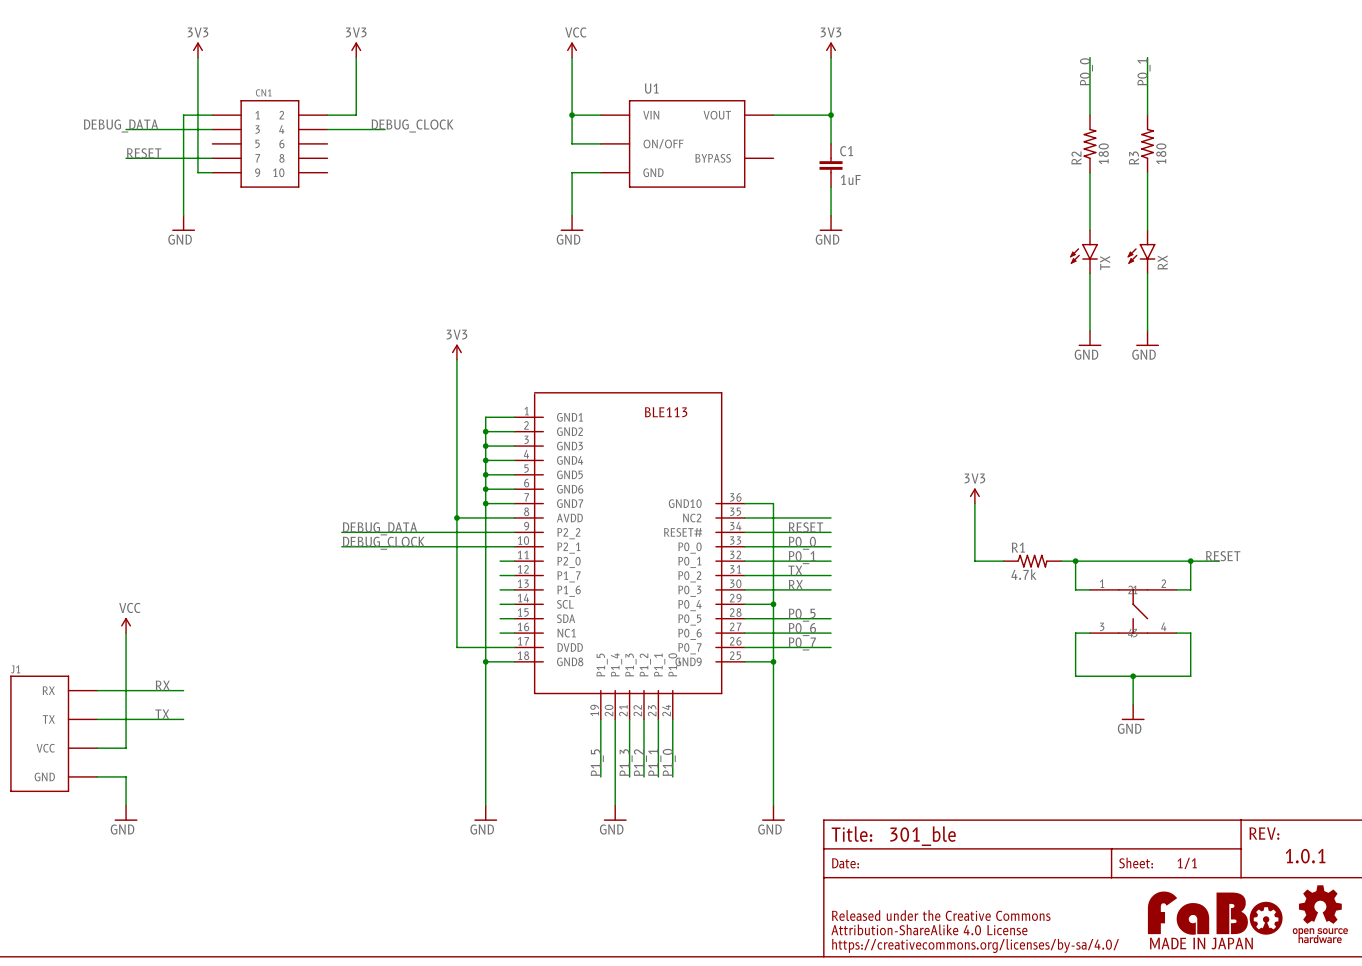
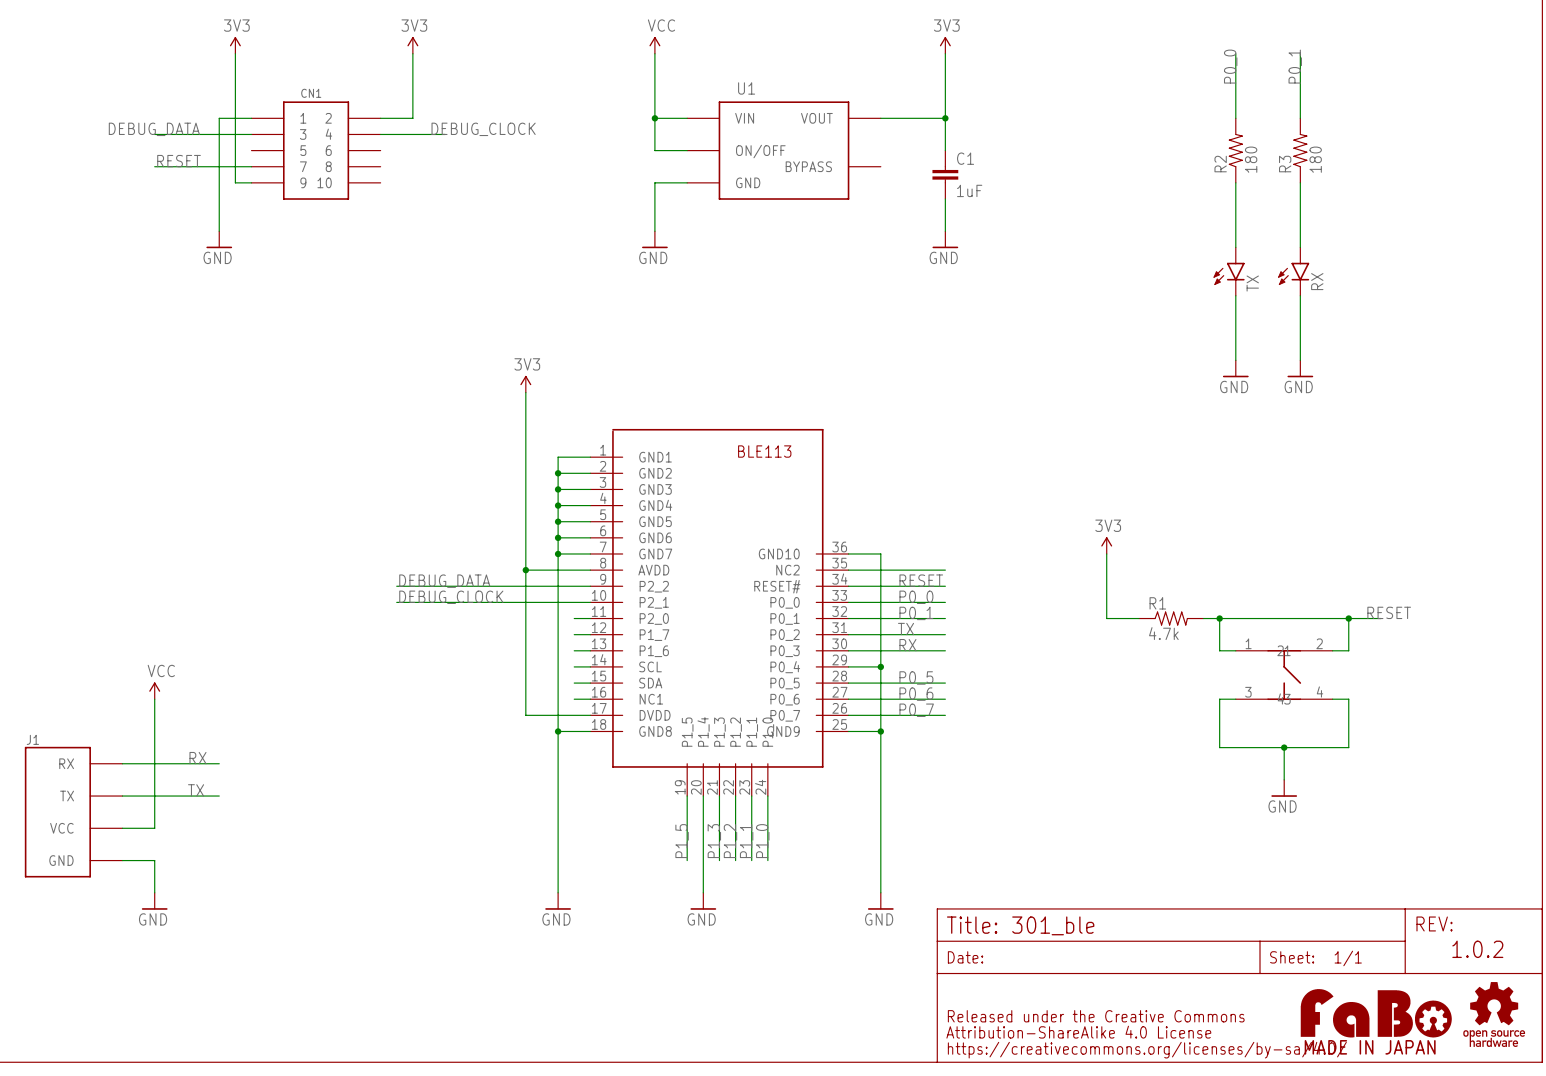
text: 1.0.1 (1305, 856) -> 1.0.2 (1477, 949)

